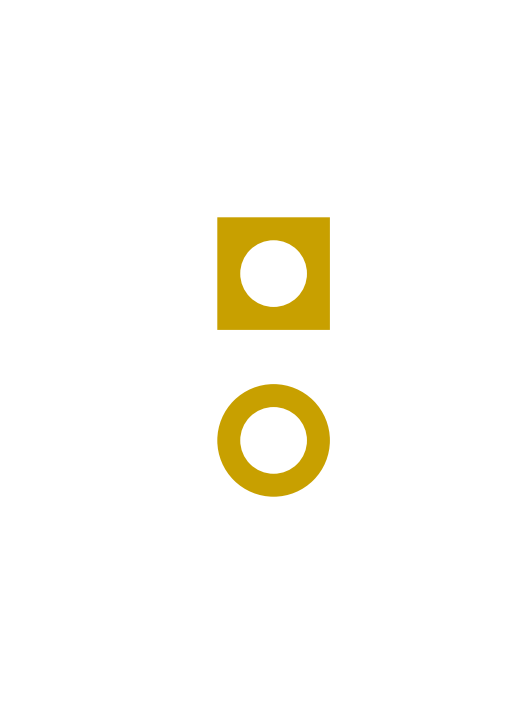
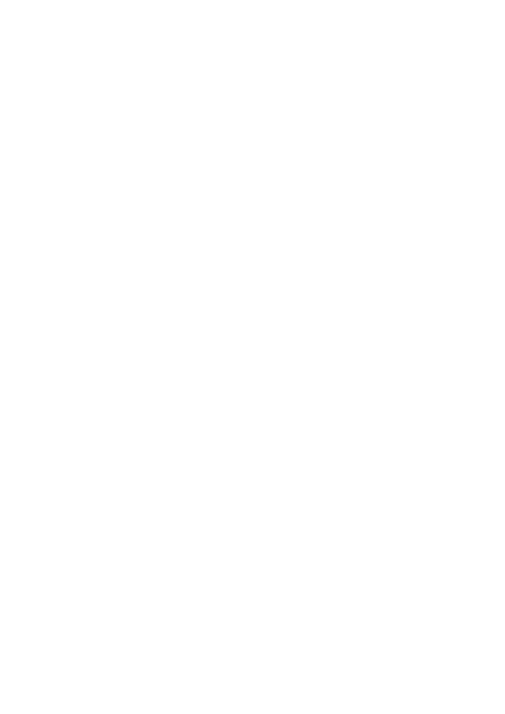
part: (273, 357) -> none

